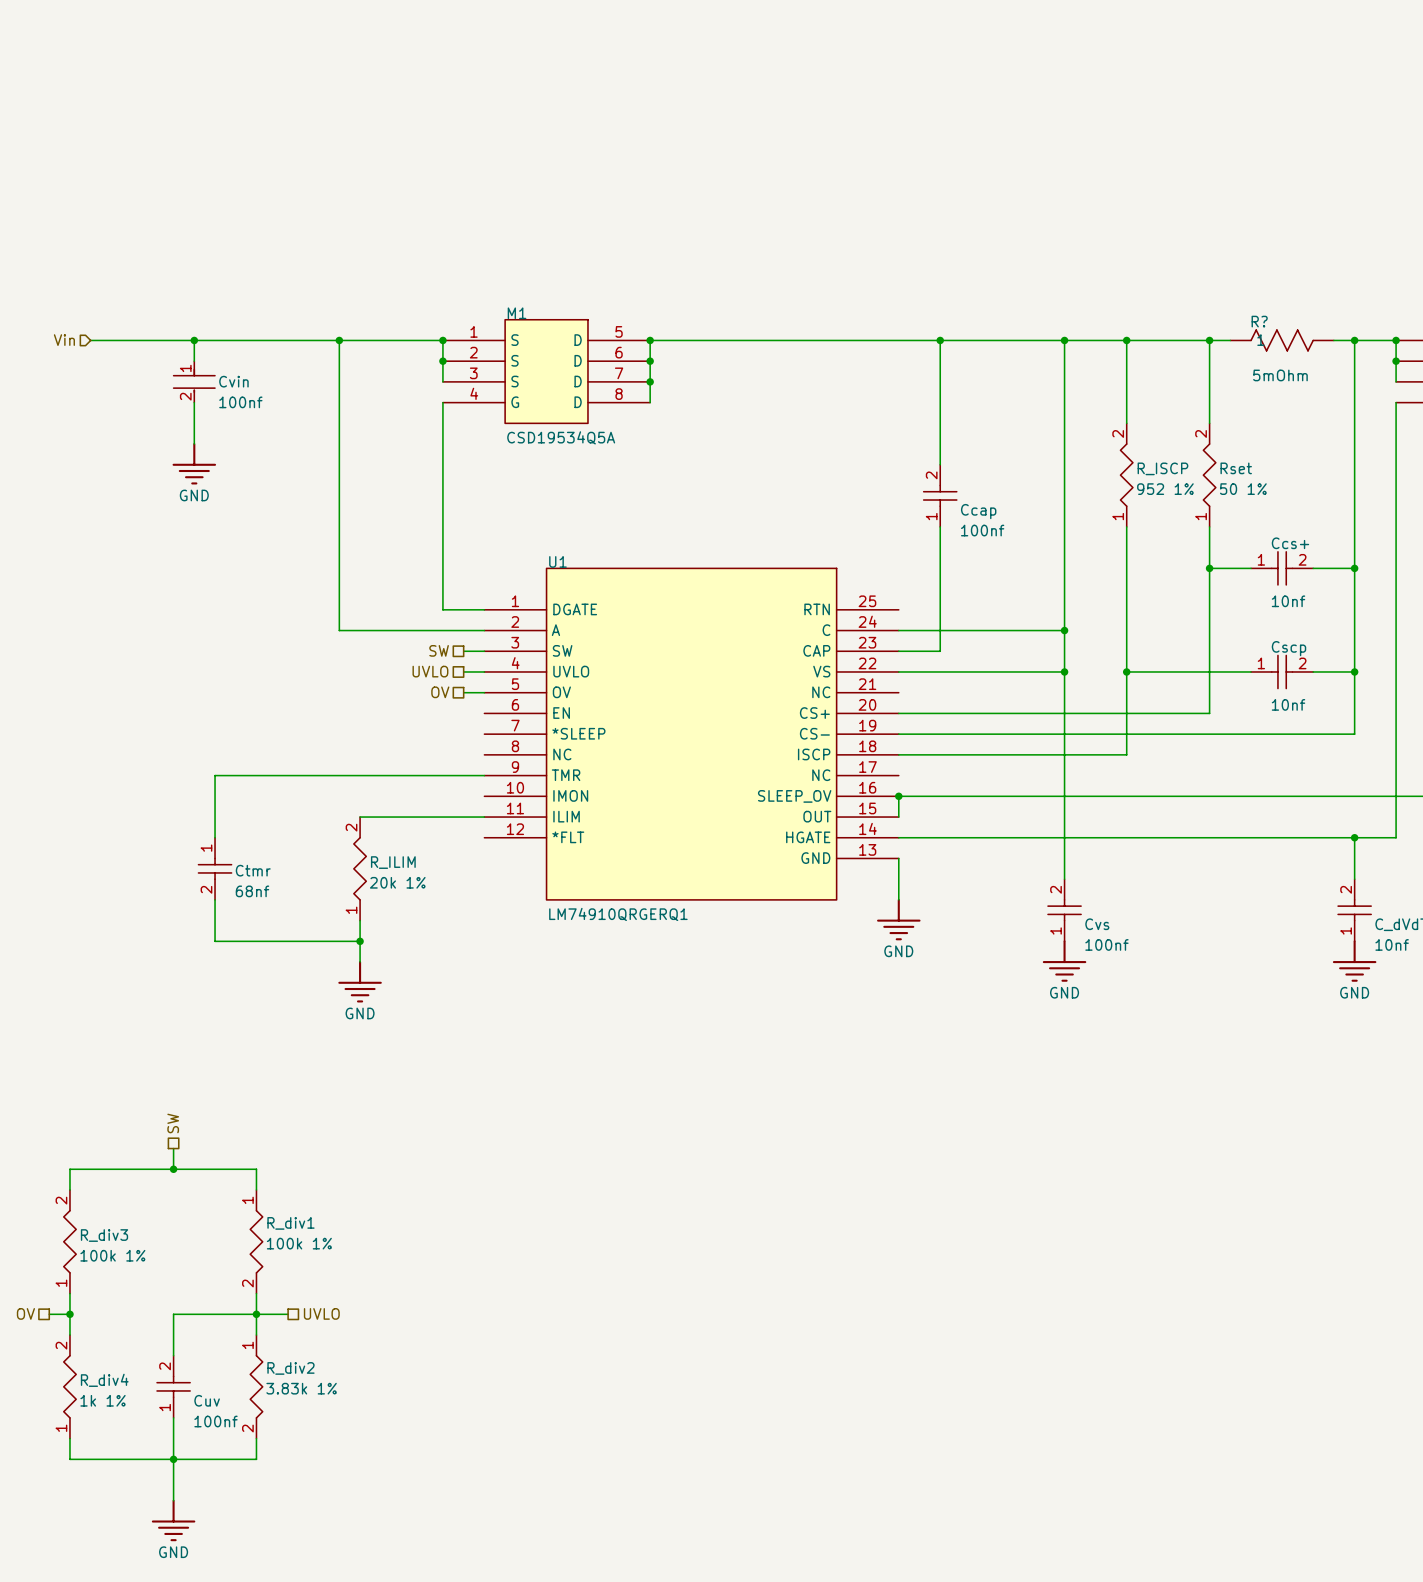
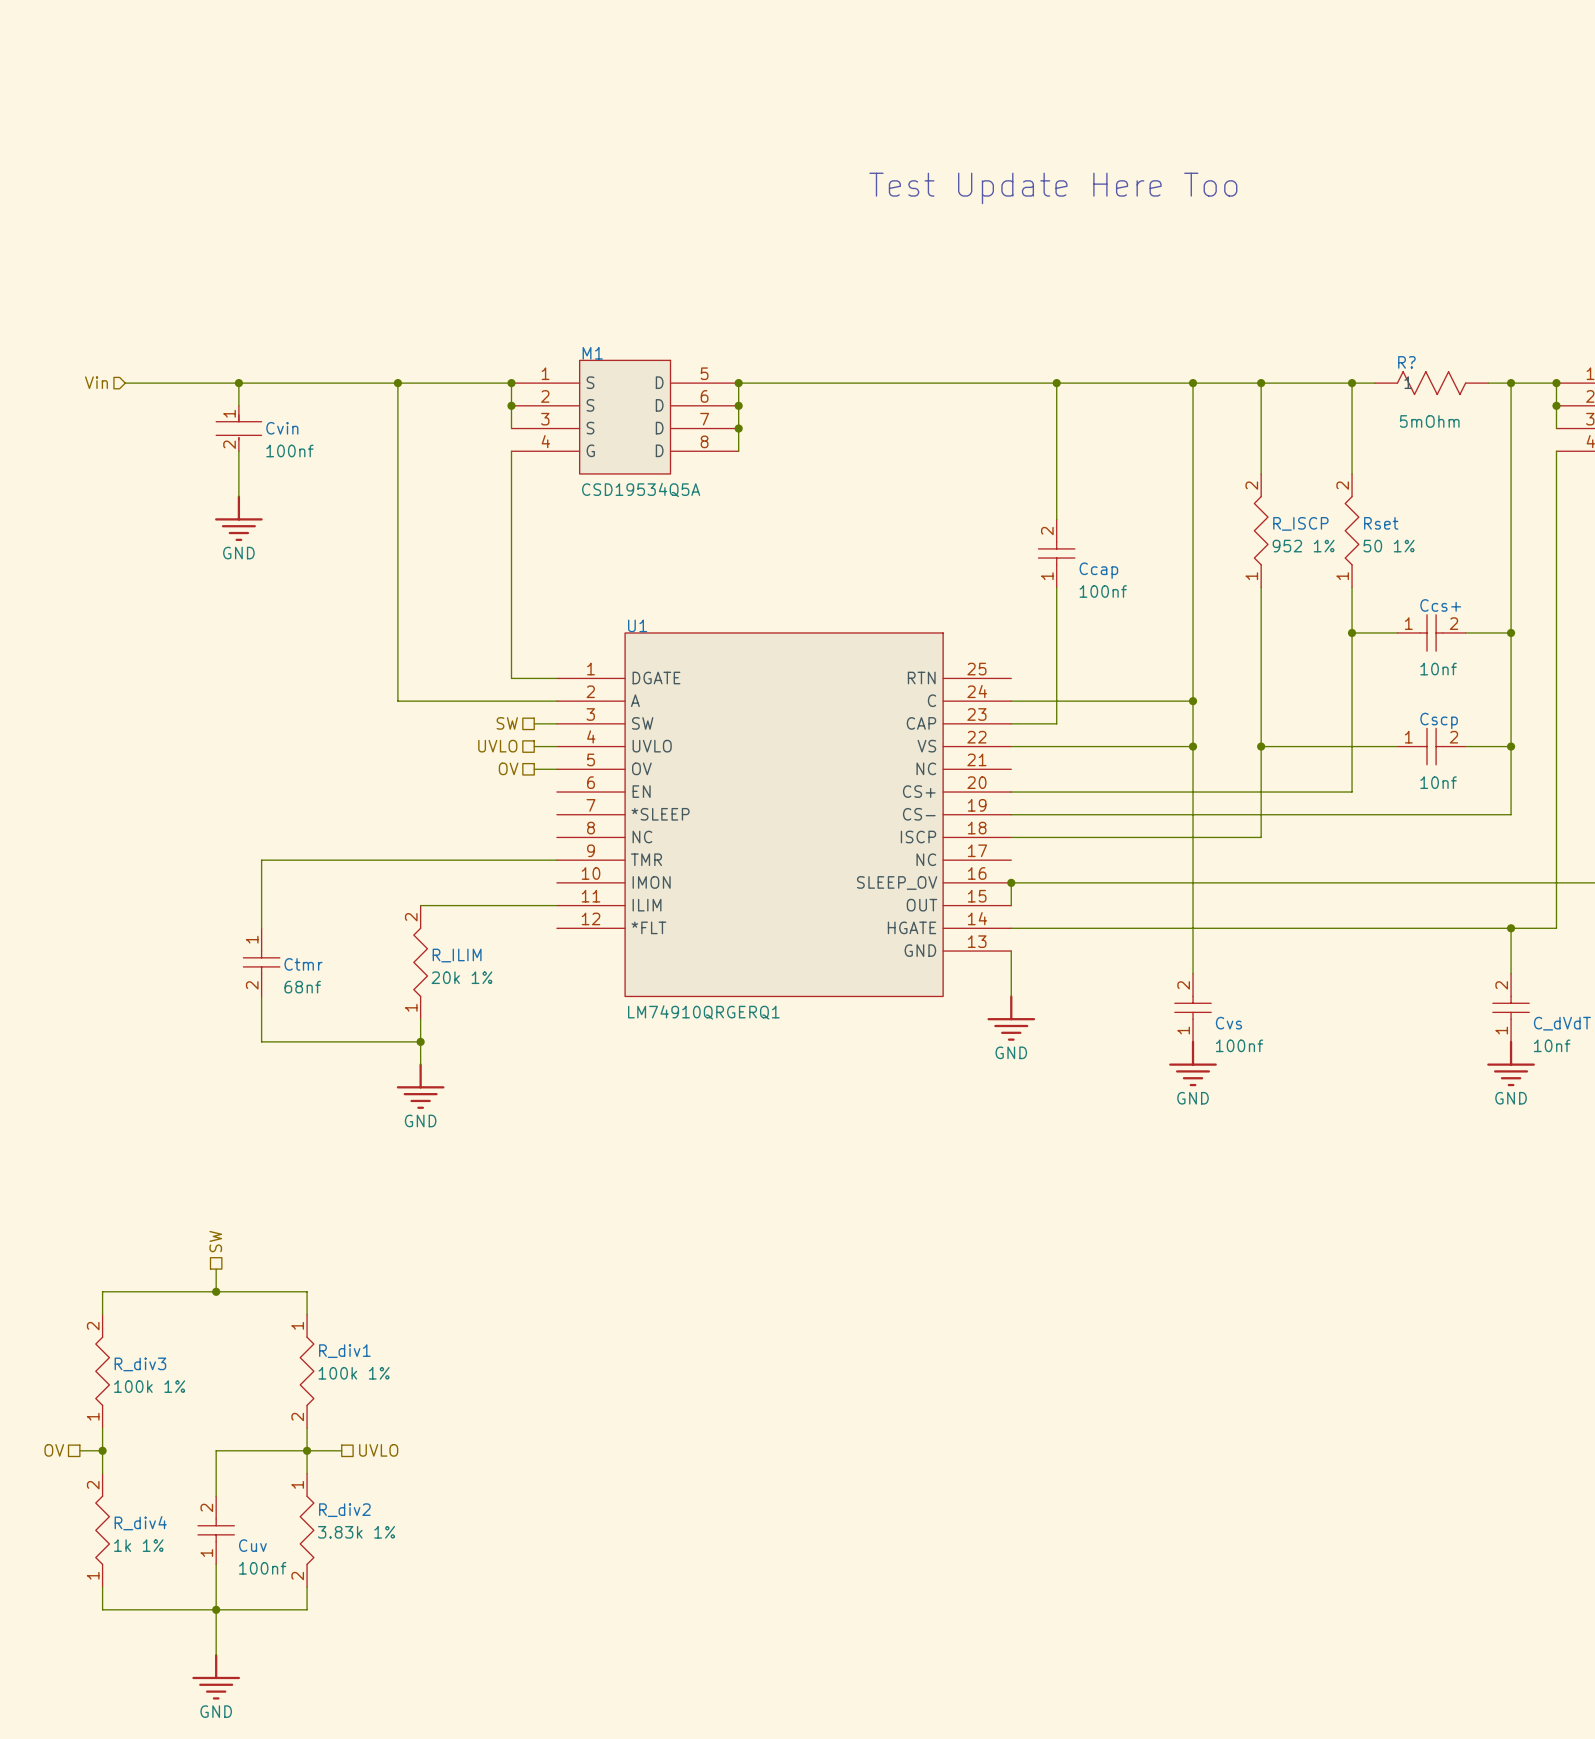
text: none -> Test Update Here Too (1053, 188)

